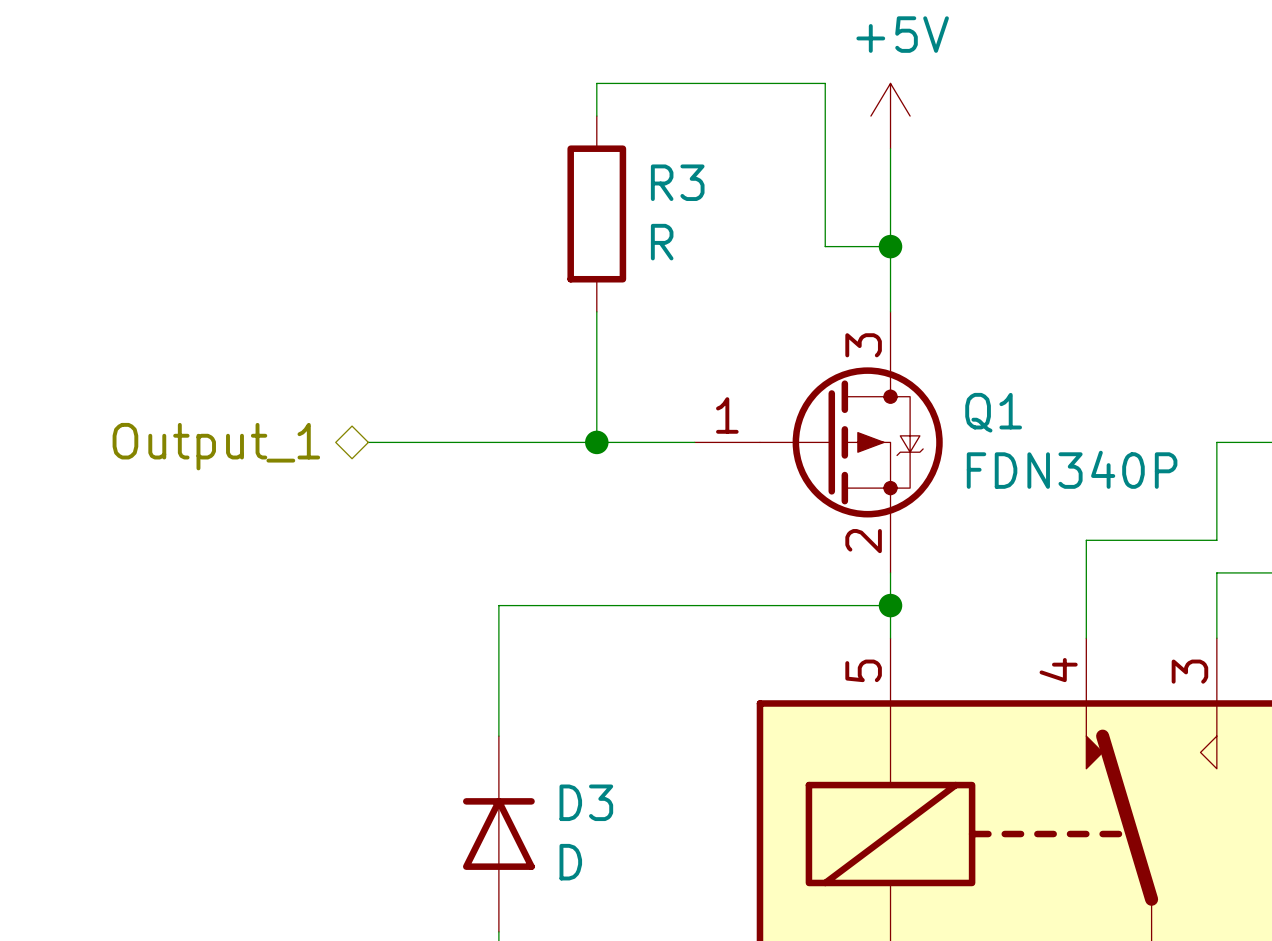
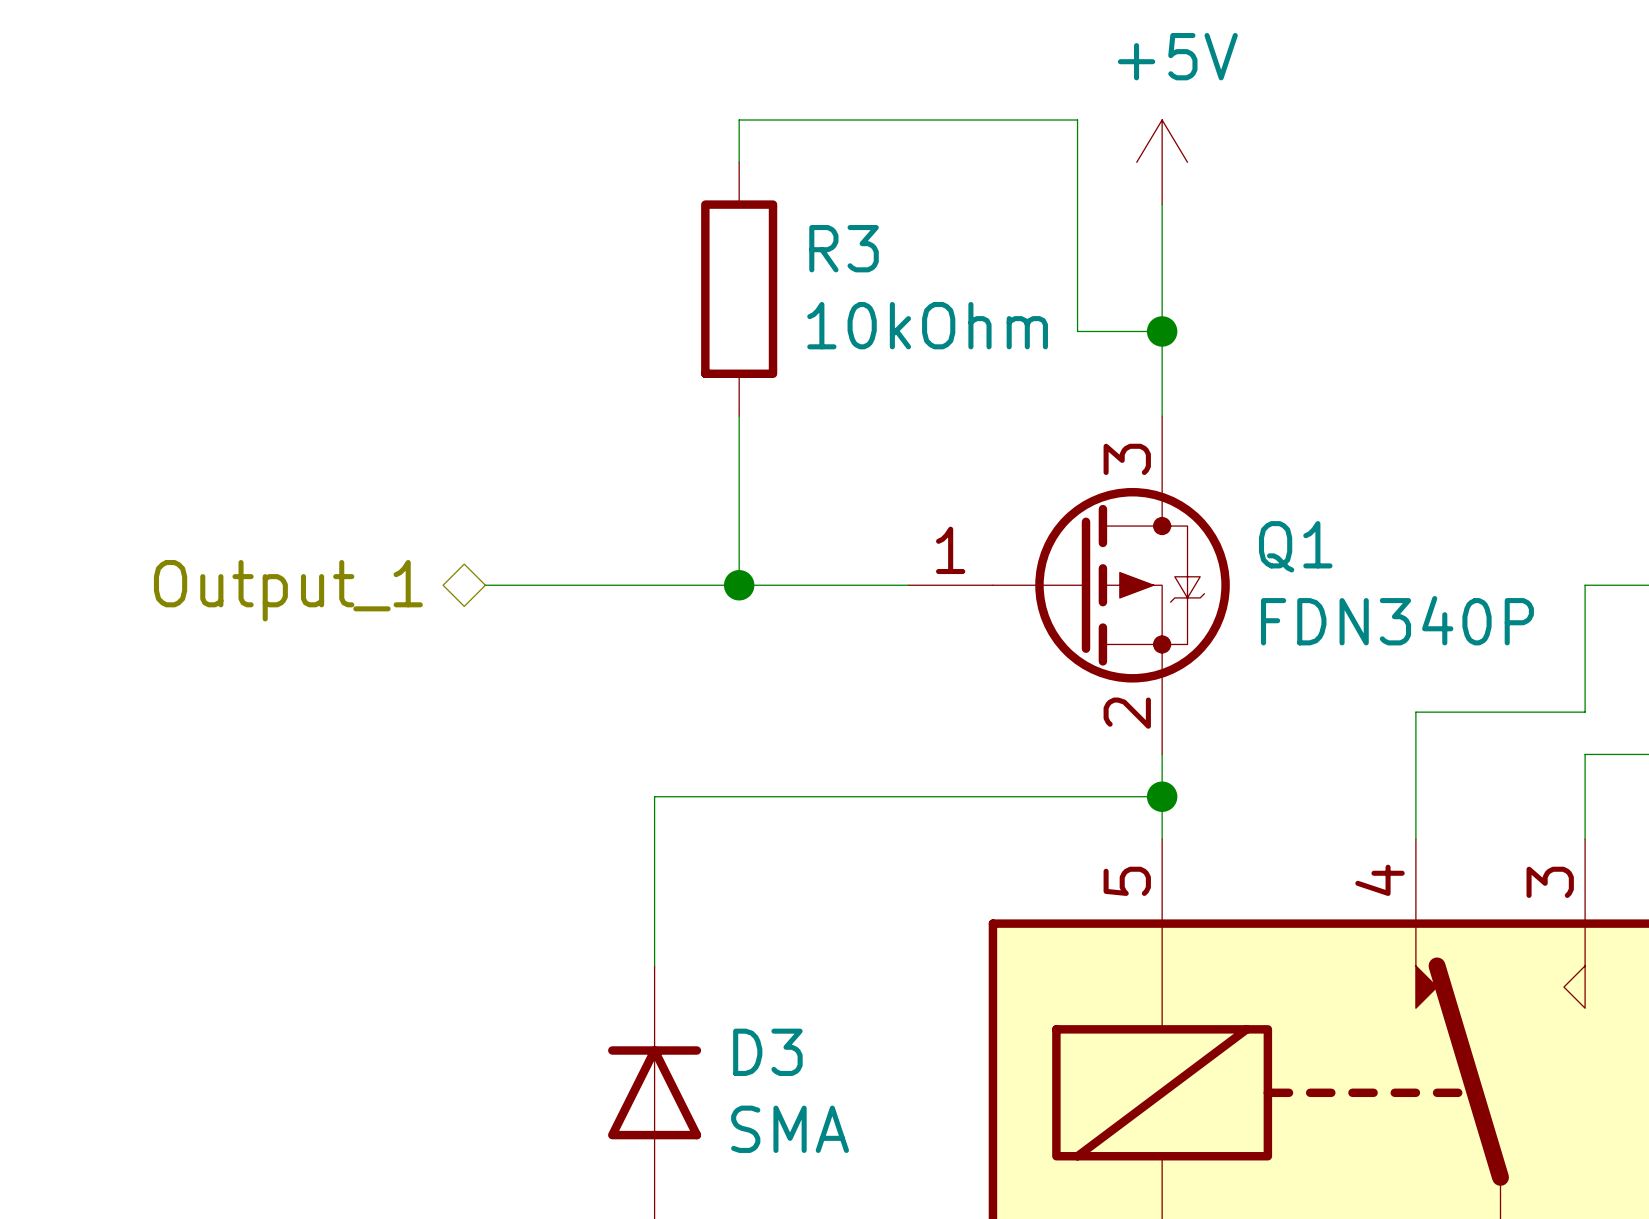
wire: (596, 83) (596, 116) -> (781, 120) (739, 120) (739, 162)
R3 position: (596, 213) -> (739, 289)
R3 value: R (662, 242) -> 10kOhm (927, 325)
wire: (596, 311) (596, 442) -> (739, 416) (739, 585)
junction position: (596, 442) -> (739, 585)
D3 value: D (570, 862) -> SMA (790, 1129)

